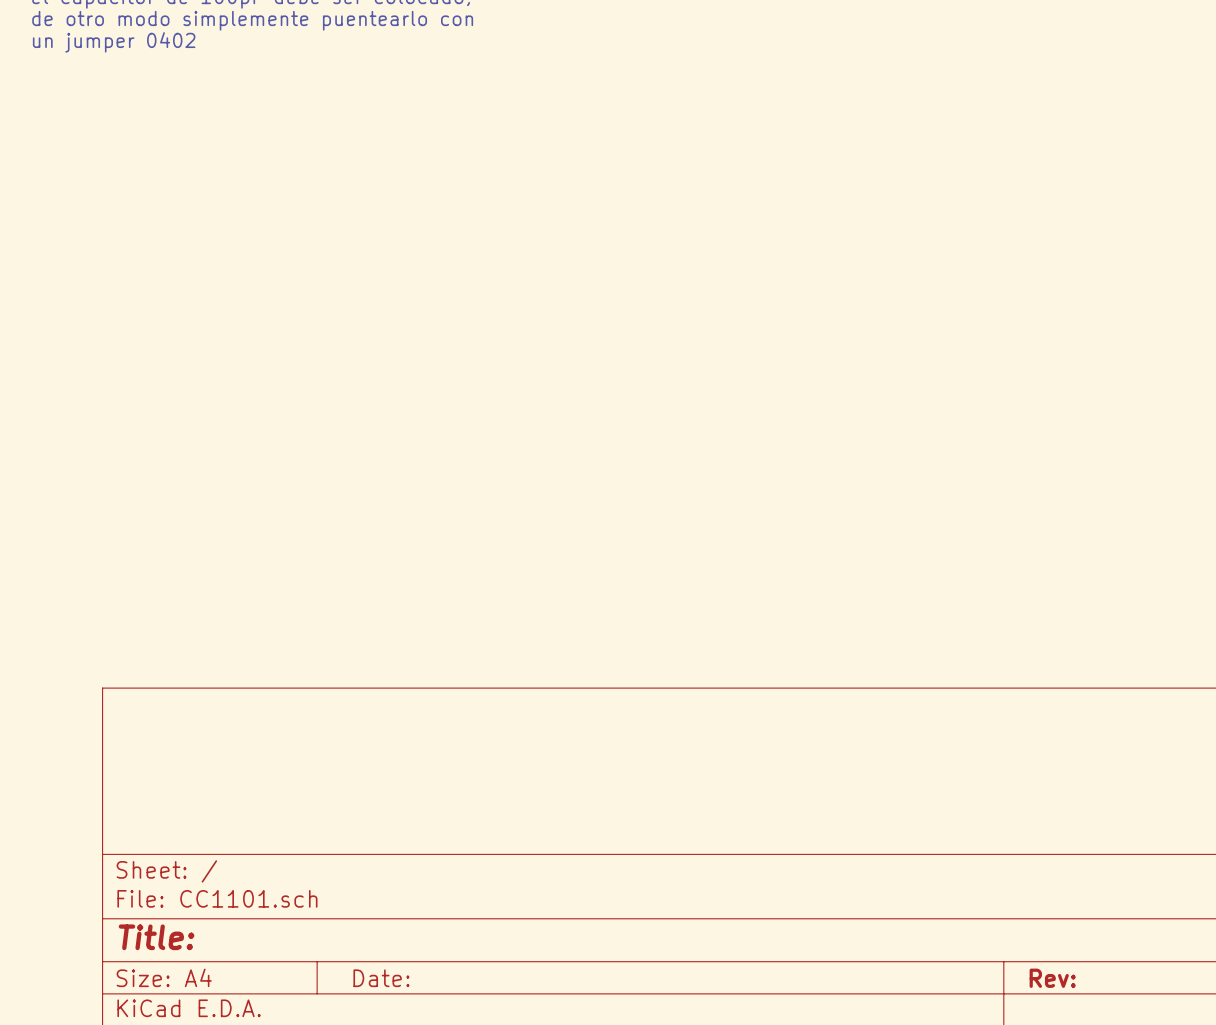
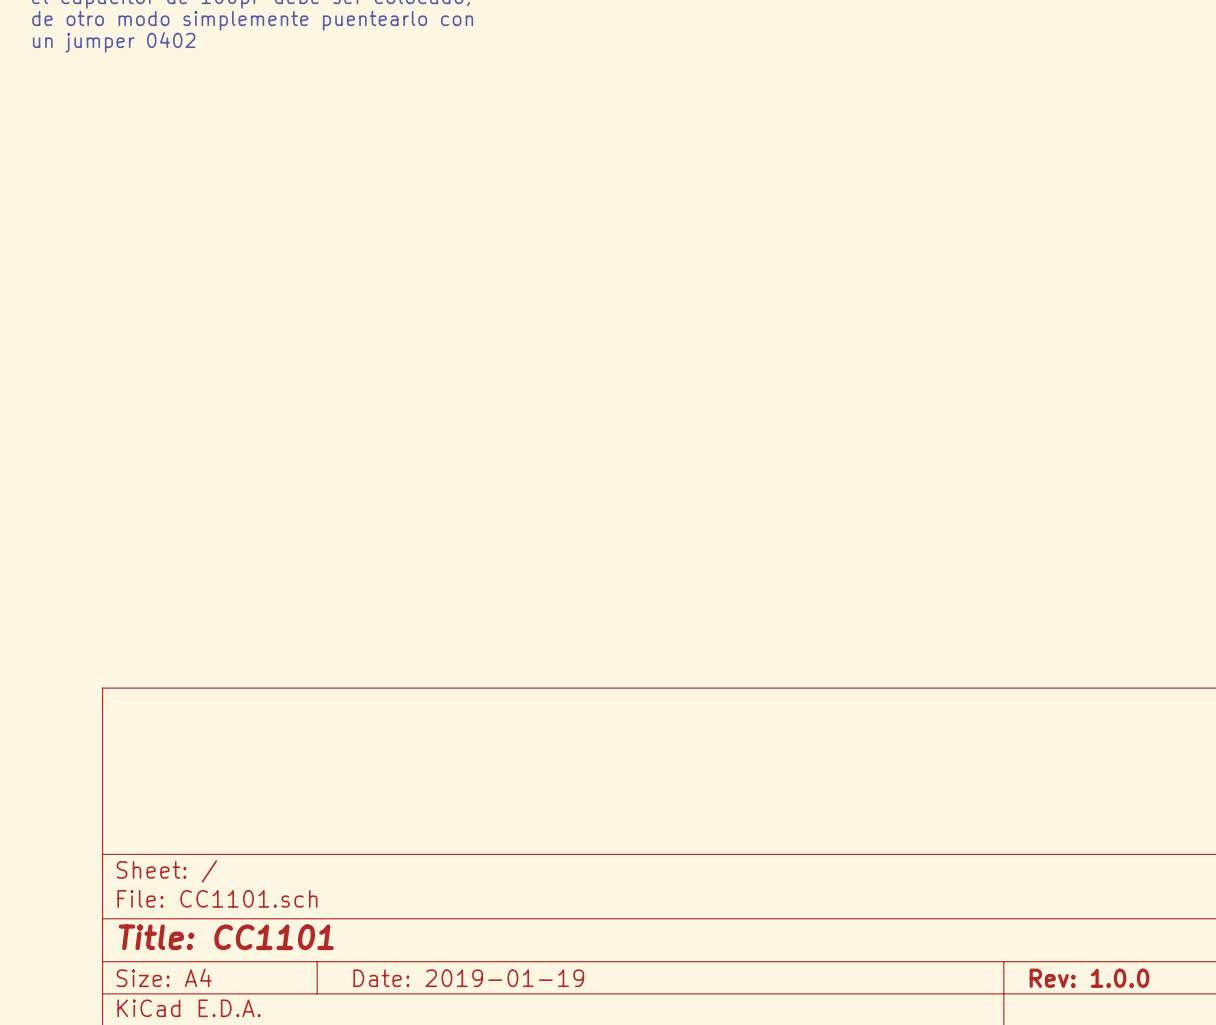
title block: Title: (156, 937) -> Title: CC1101 (226, 937)
title block: Date: (381, 978) -> Date: 2019-01-19 (468, 978)
title block: Rev: (1052, 978) -> Rev: 1.0.0 (1089, 978)

